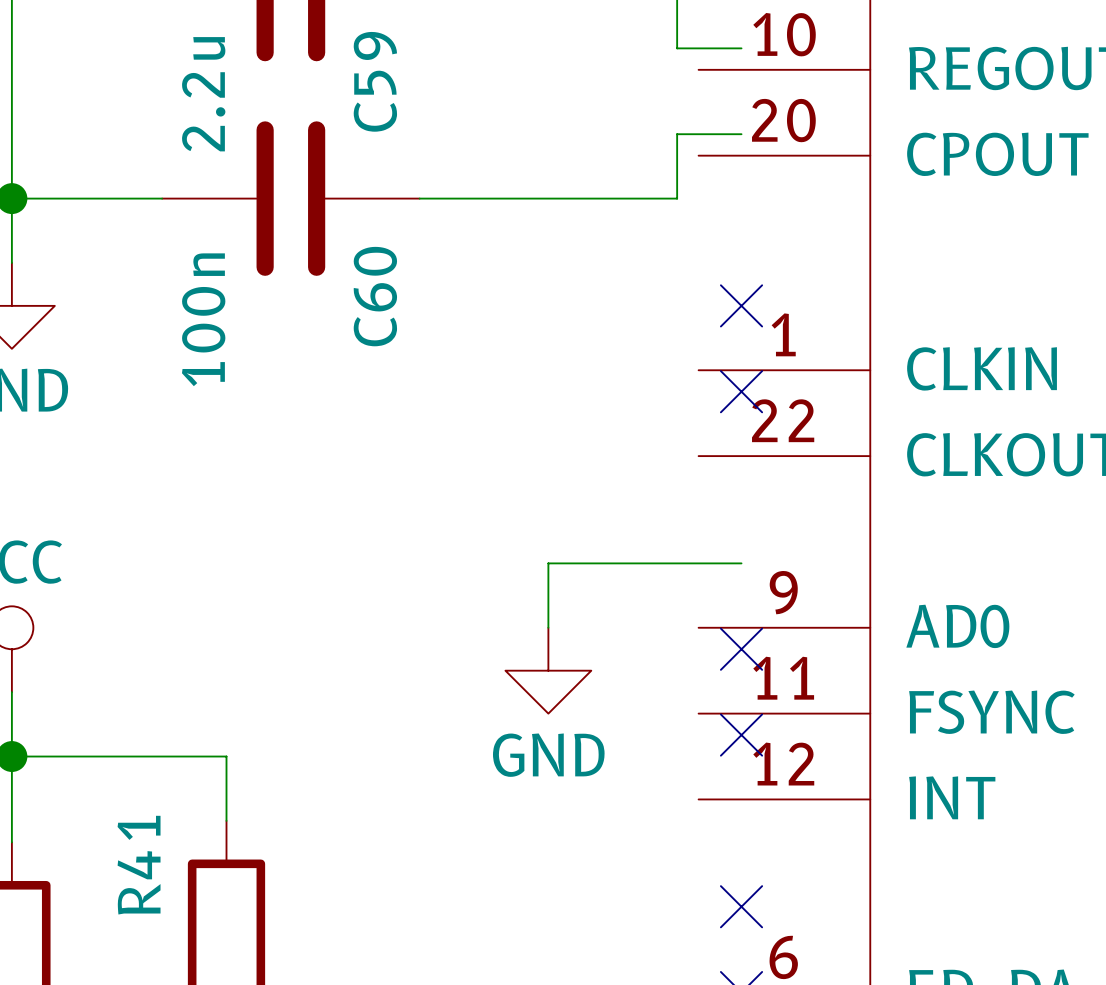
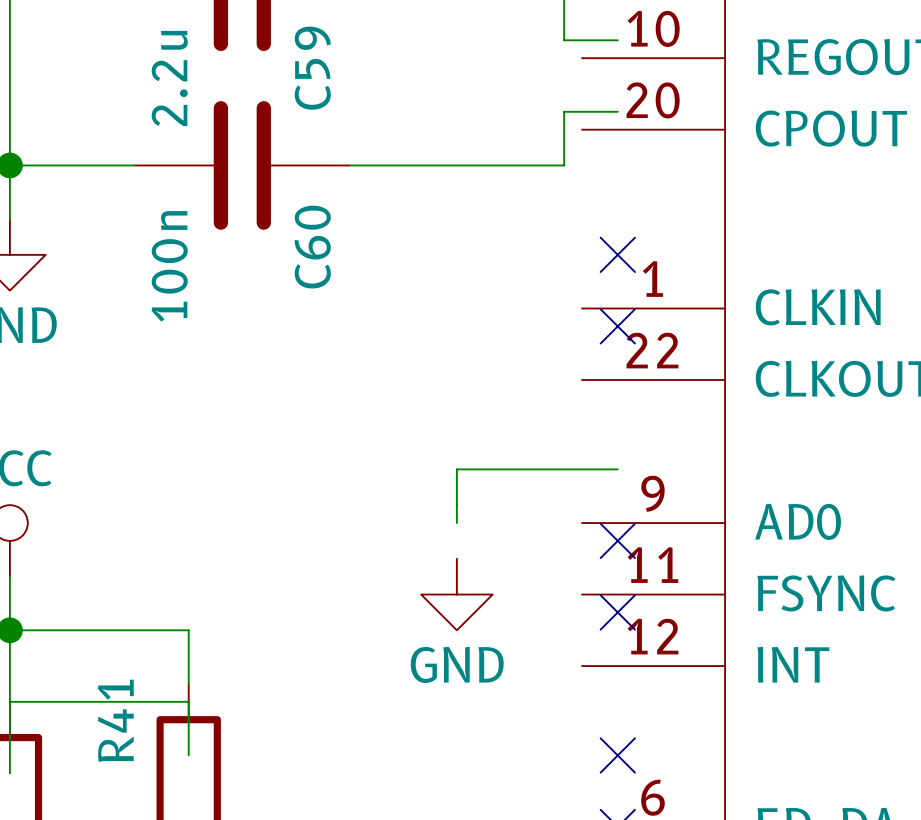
power symbol position: GND (548, 670) -> GND (456, 594)
wire: none -> (188, 755) (188, 701) (9, 701) (9, 773)

